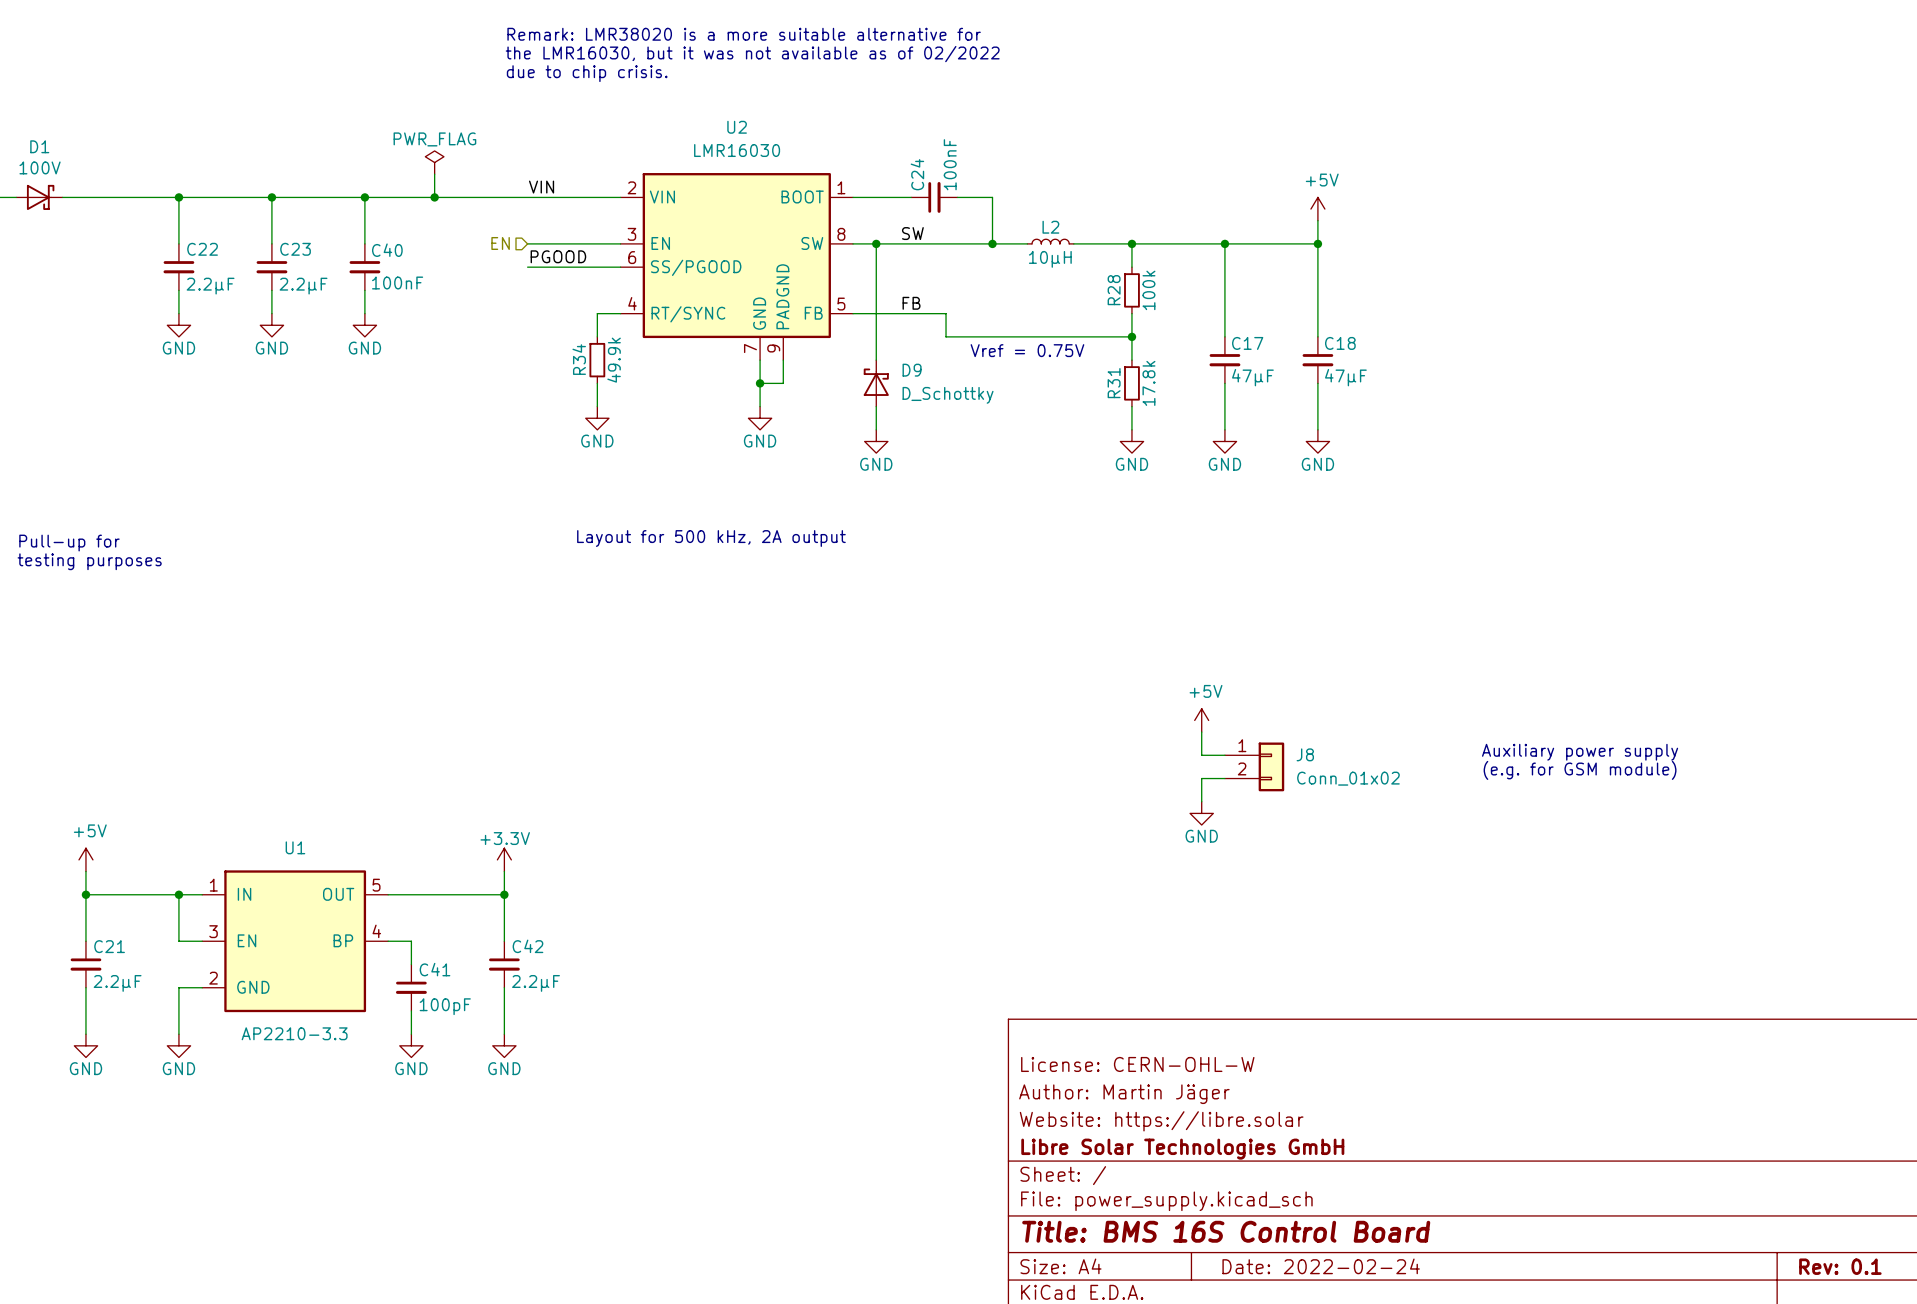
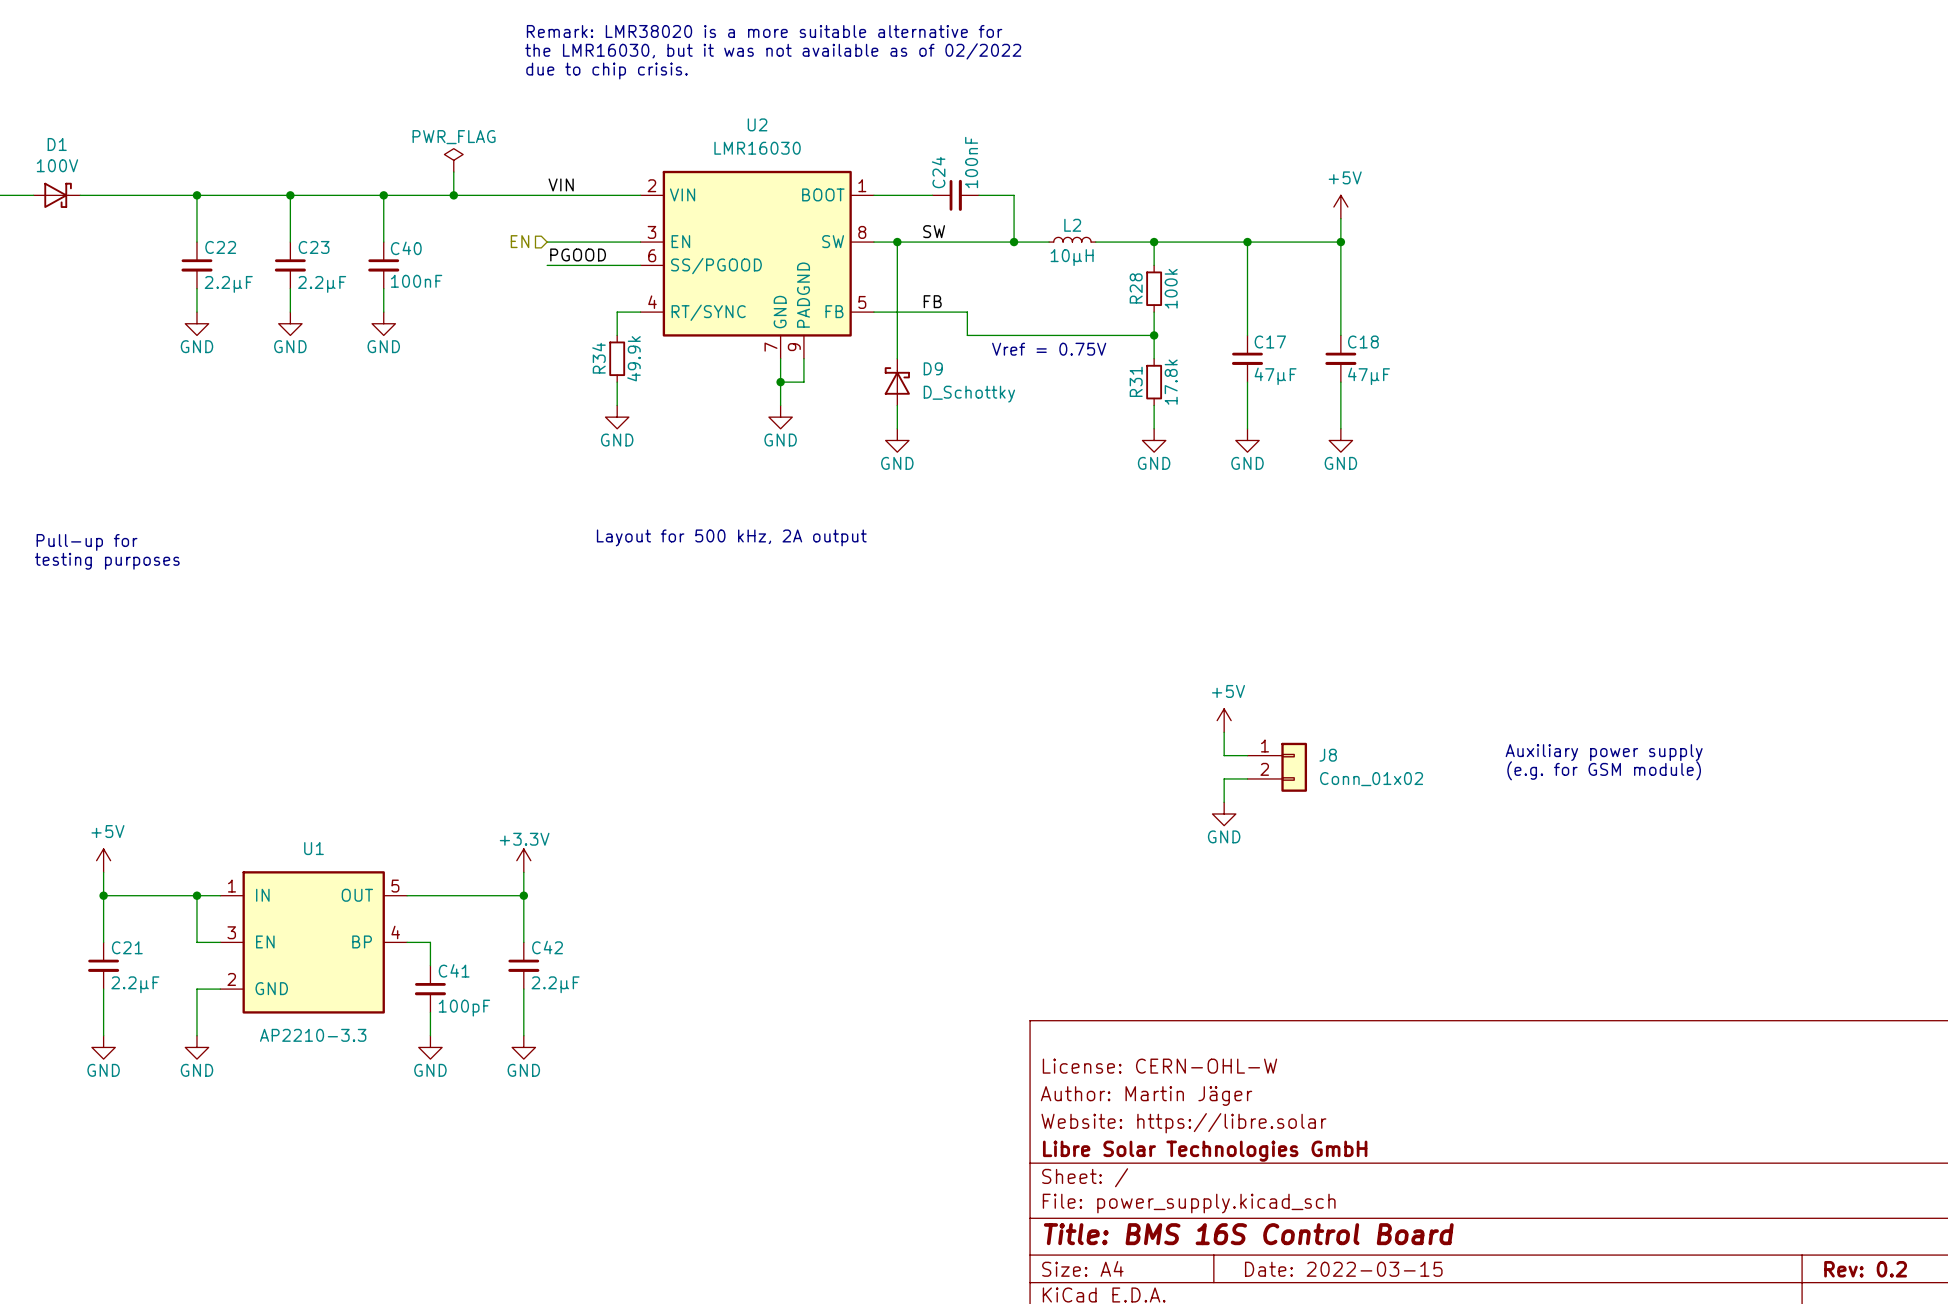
title block: Date: 2022-02-24 (1321, 1266) -> Date: 2022-03-15 (1343, 1269)
title block: Rev: 0.1 (1840, 1266) -> Rev: 0.2 (1865, 1269)

